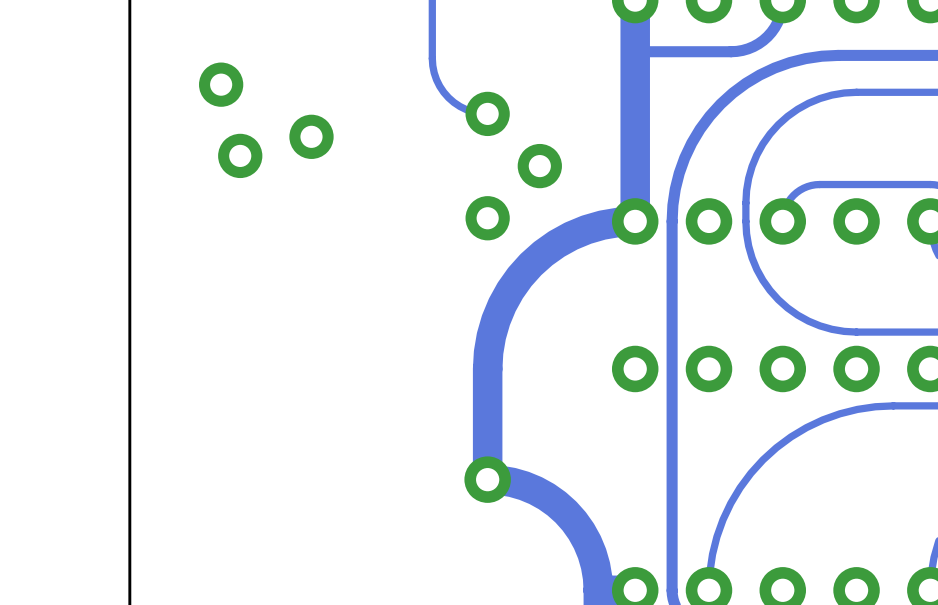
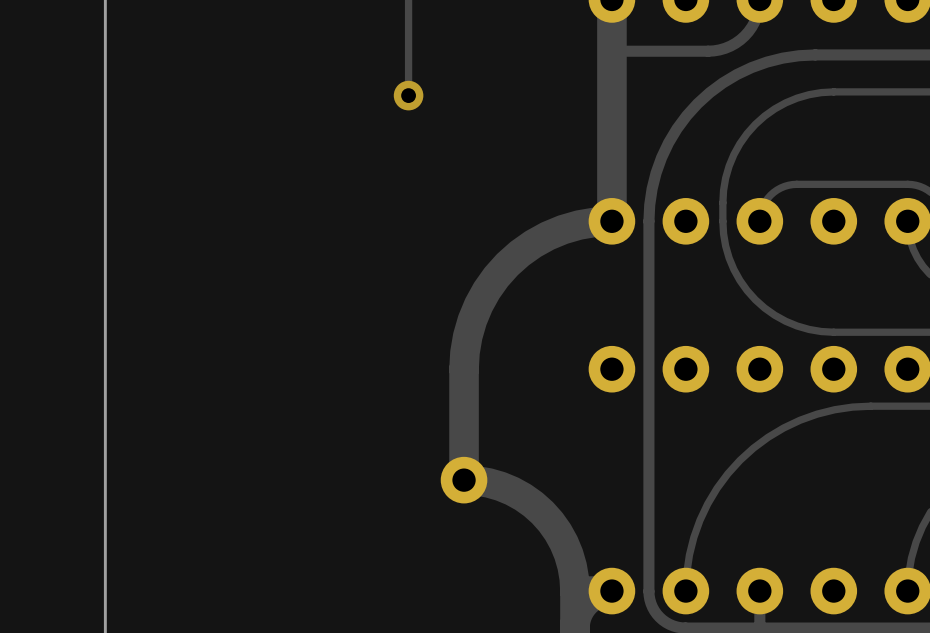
track: (432, 58) (436, 79) (448, 97) (466, 109) (487, 113) -> (408, 58) (408, 95)
via: none -> (408, 95)
part: (266, 120) -> none
part: (513, 166) -> none

